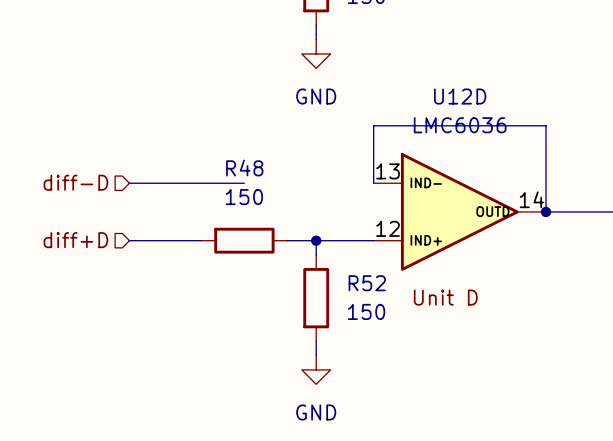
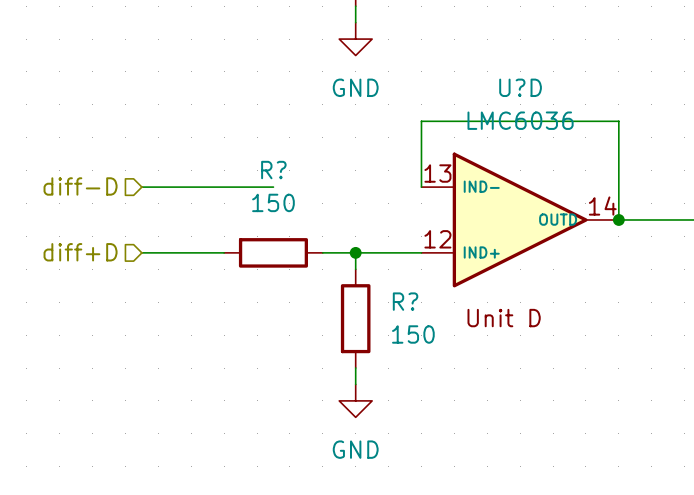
U12D name: U12D (460, 96) -> U?D (520, 87)
R48 name: R48 (244, 168) -> R? (273, 170)
R52 name: R52 (367, 283) -> R? (405, 301)

